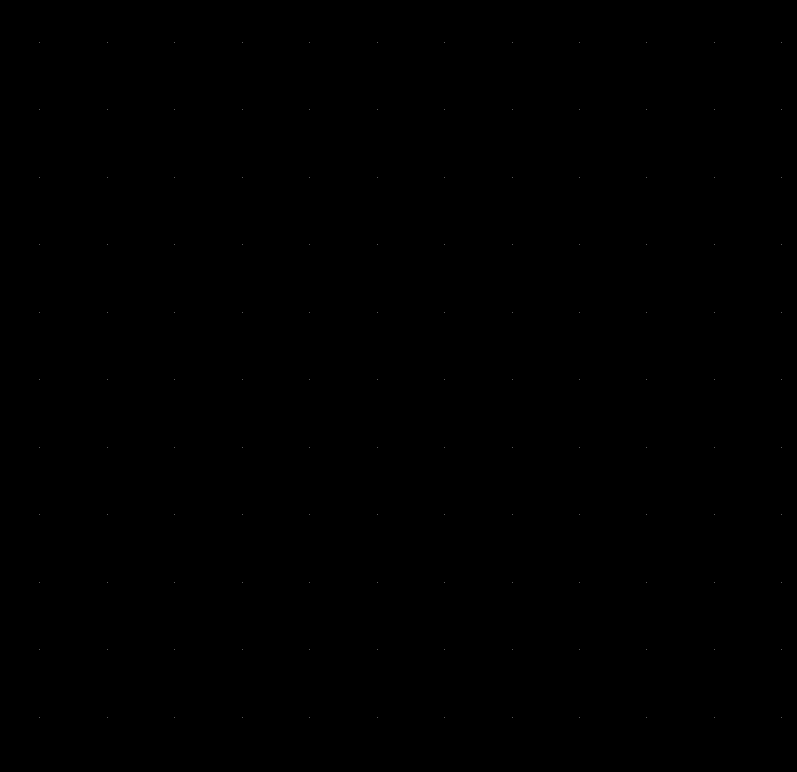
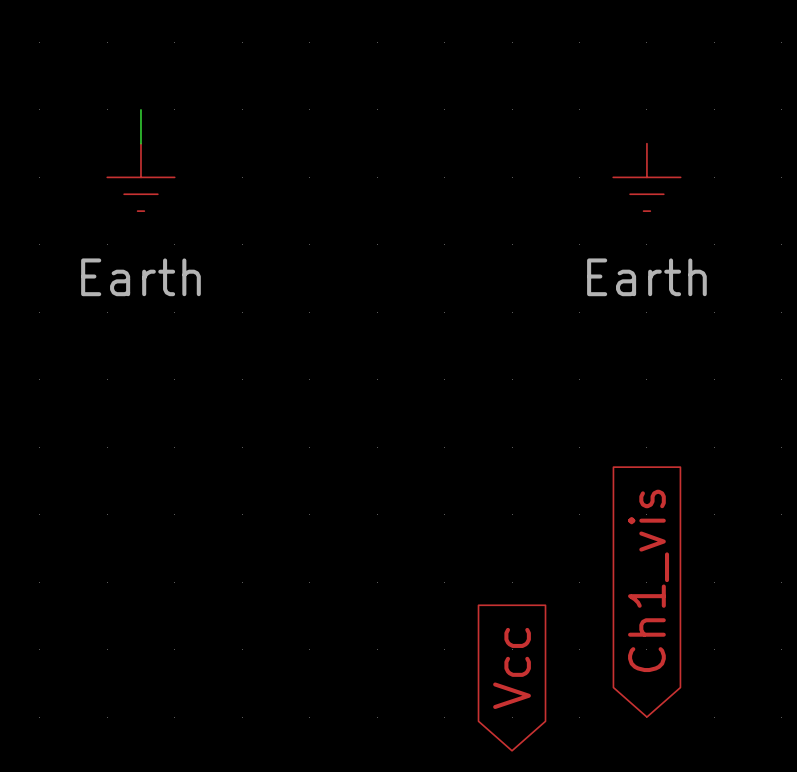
wire: none -> (140, 109) (140, 143)
power symbol: none -> Earth (140, 177)
power symbol: none -> Earth (646, 177)
global label: none -> Ch1_vis (648, 580)
global label: none -> Vcc (512, 668)

